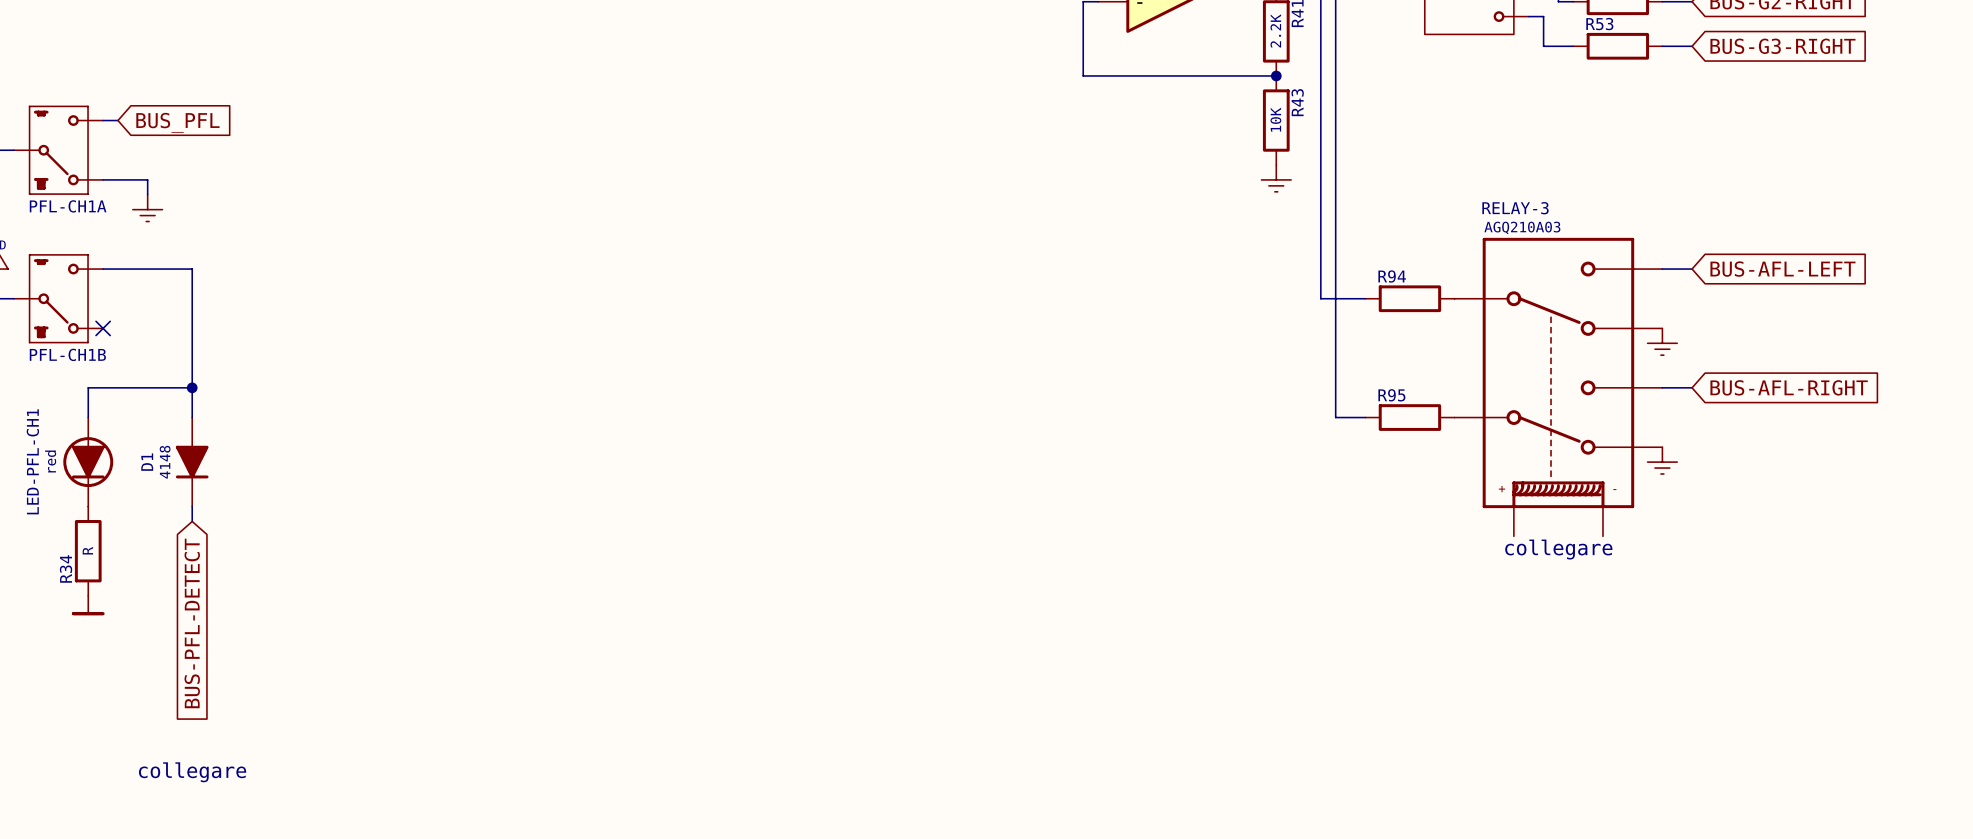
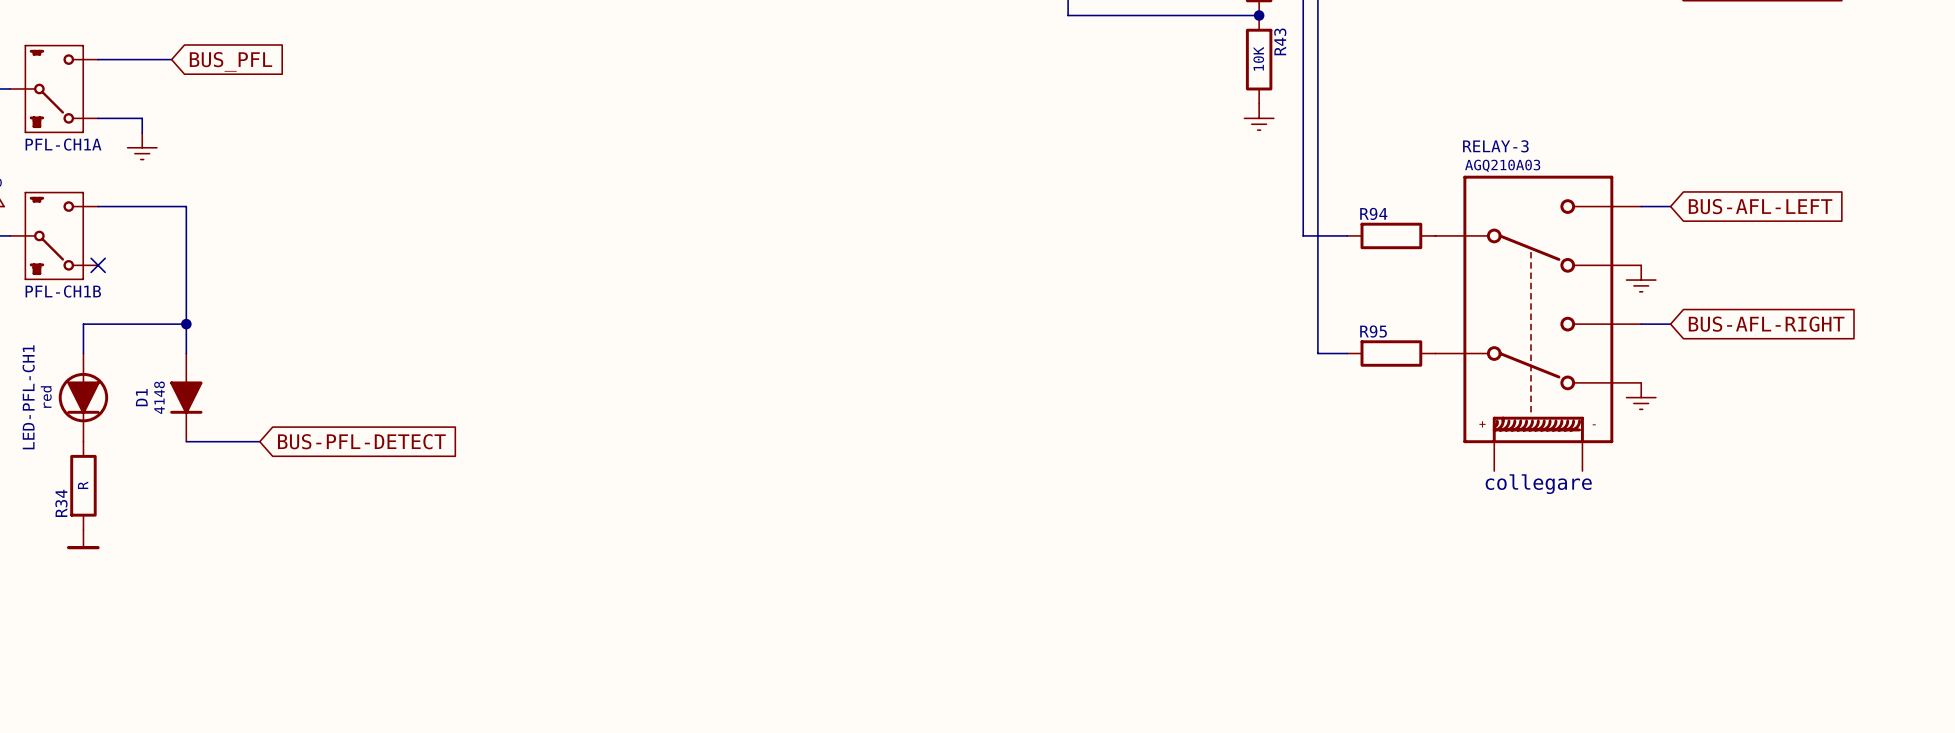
wire: none -> (112, 59) (171, 59)
global label position: BUS_PFL (177, 122) -> BUS_PFL (230, 61)
wire: (192, 506) (192, 521) -> (186, 441) (259, 441)
global label rotation: 0° (192, 623) -> 90° counterclockwise (361, 441)
text: collegare (192, 772) -> none

